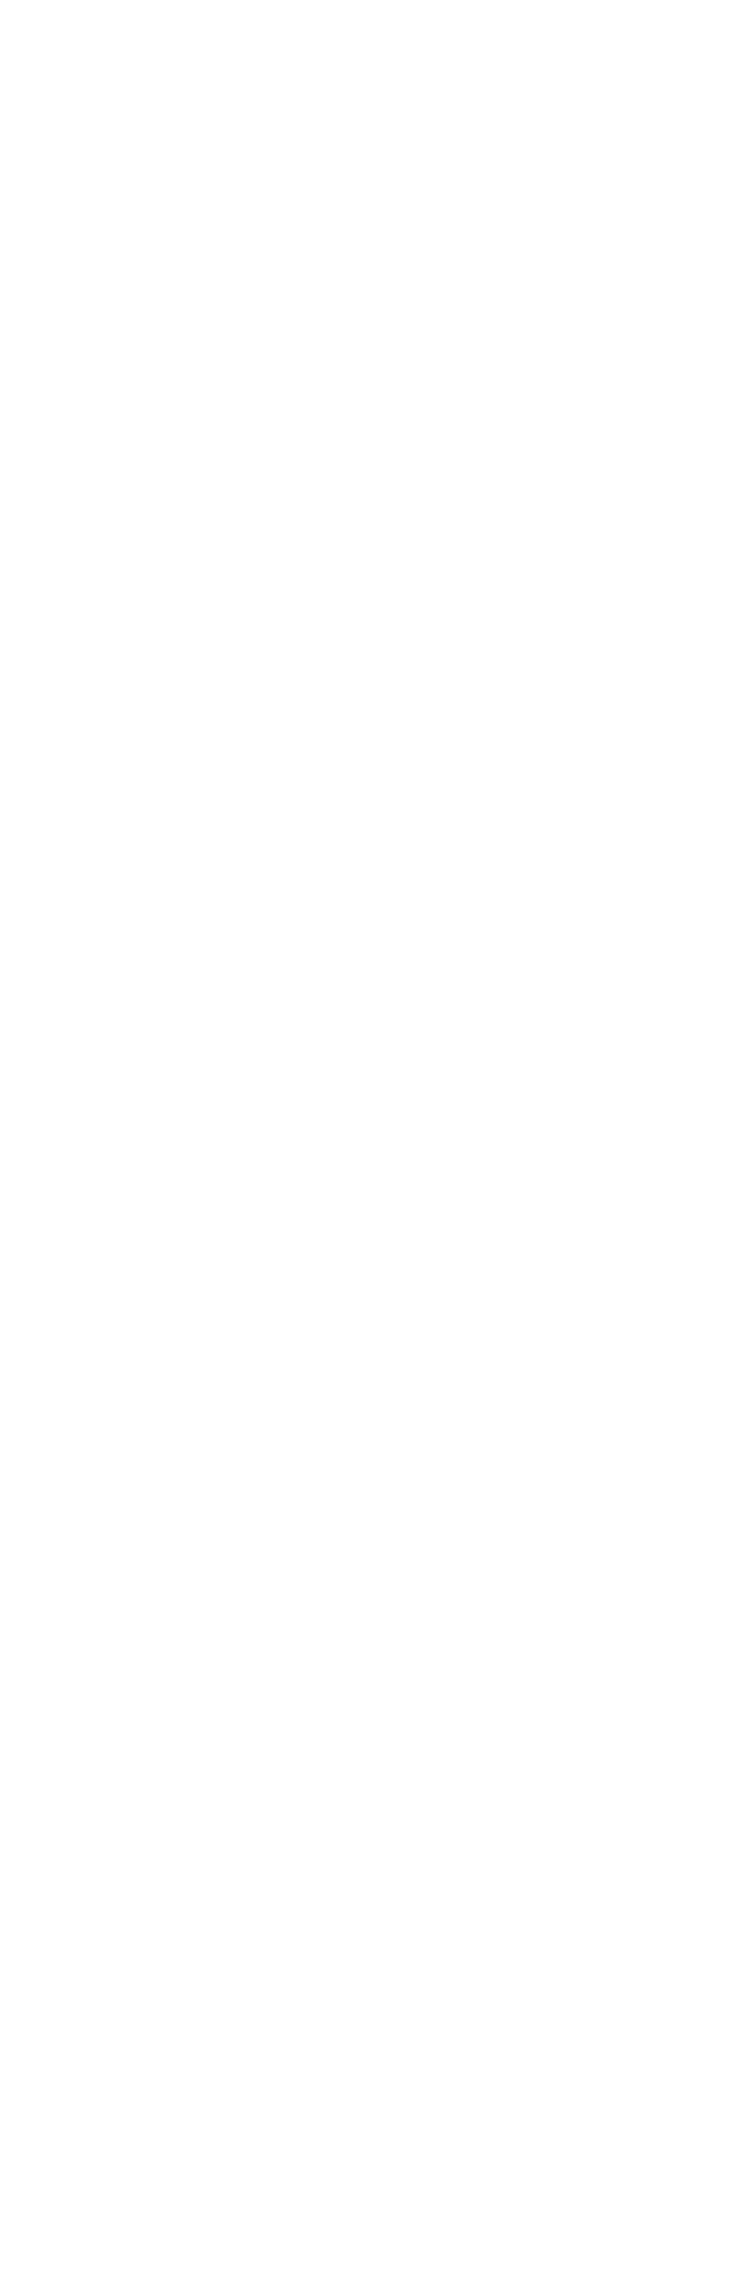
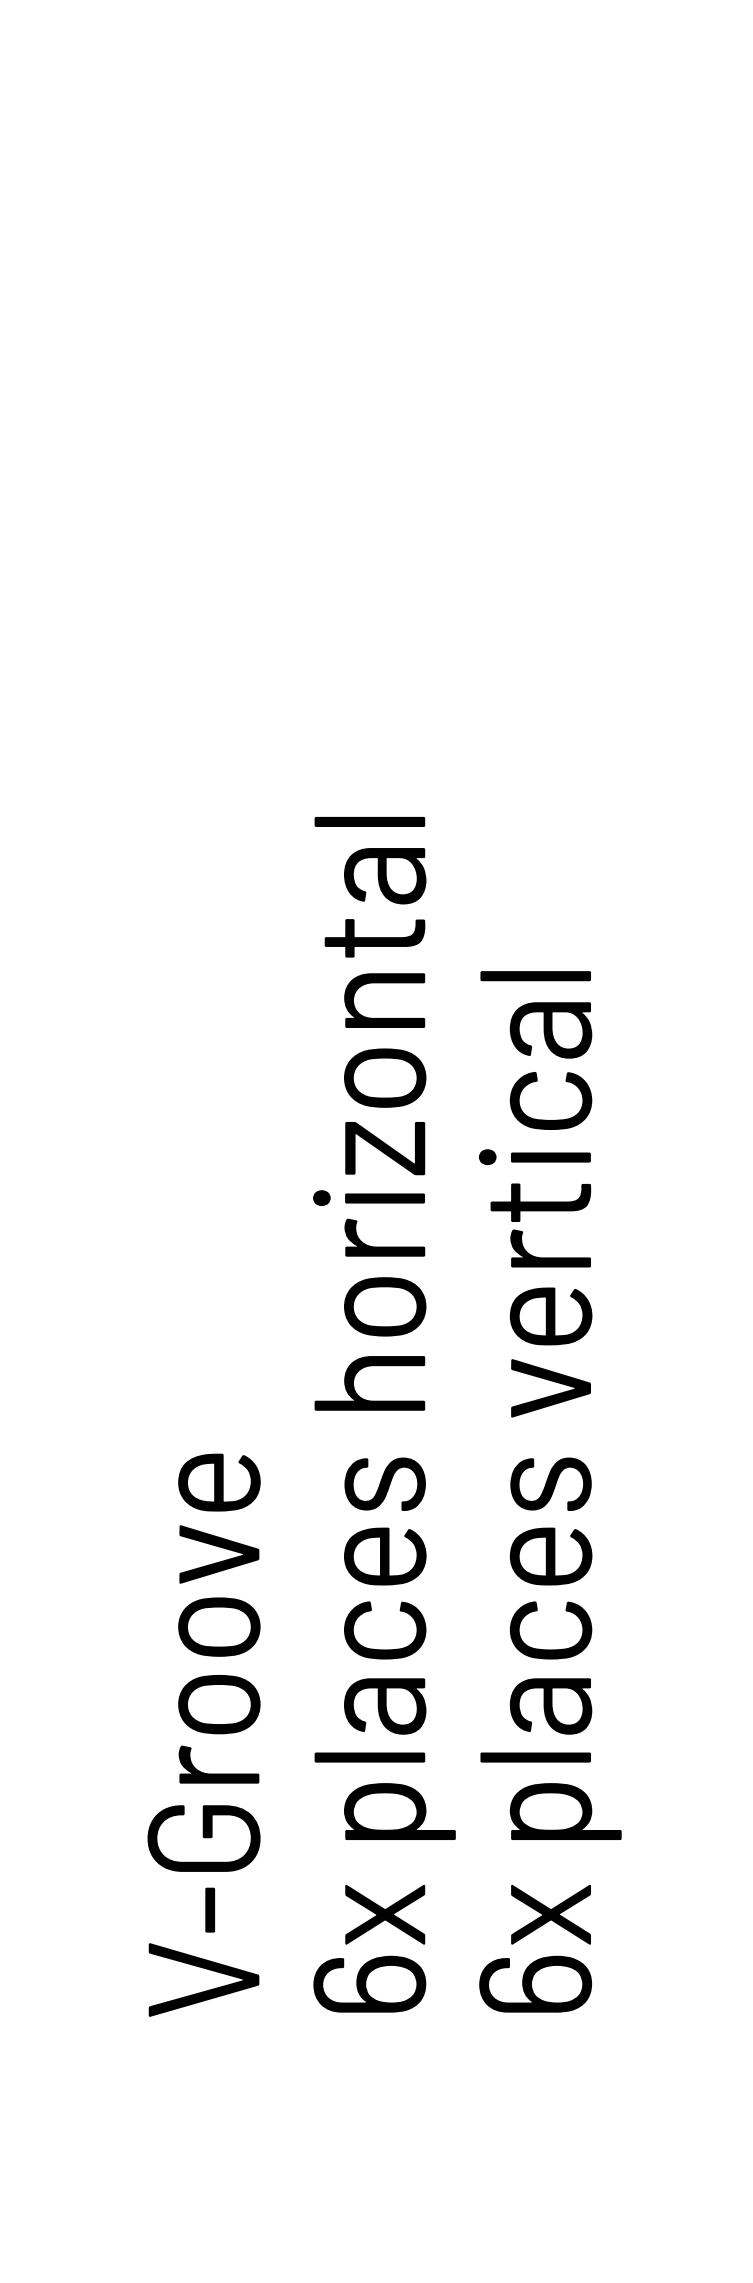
text: none -> 6x places horizontal (384, 1414)
text: none -> 6x places vertical (550, 1491)
text: none -> V-Groove (204, 1735)

